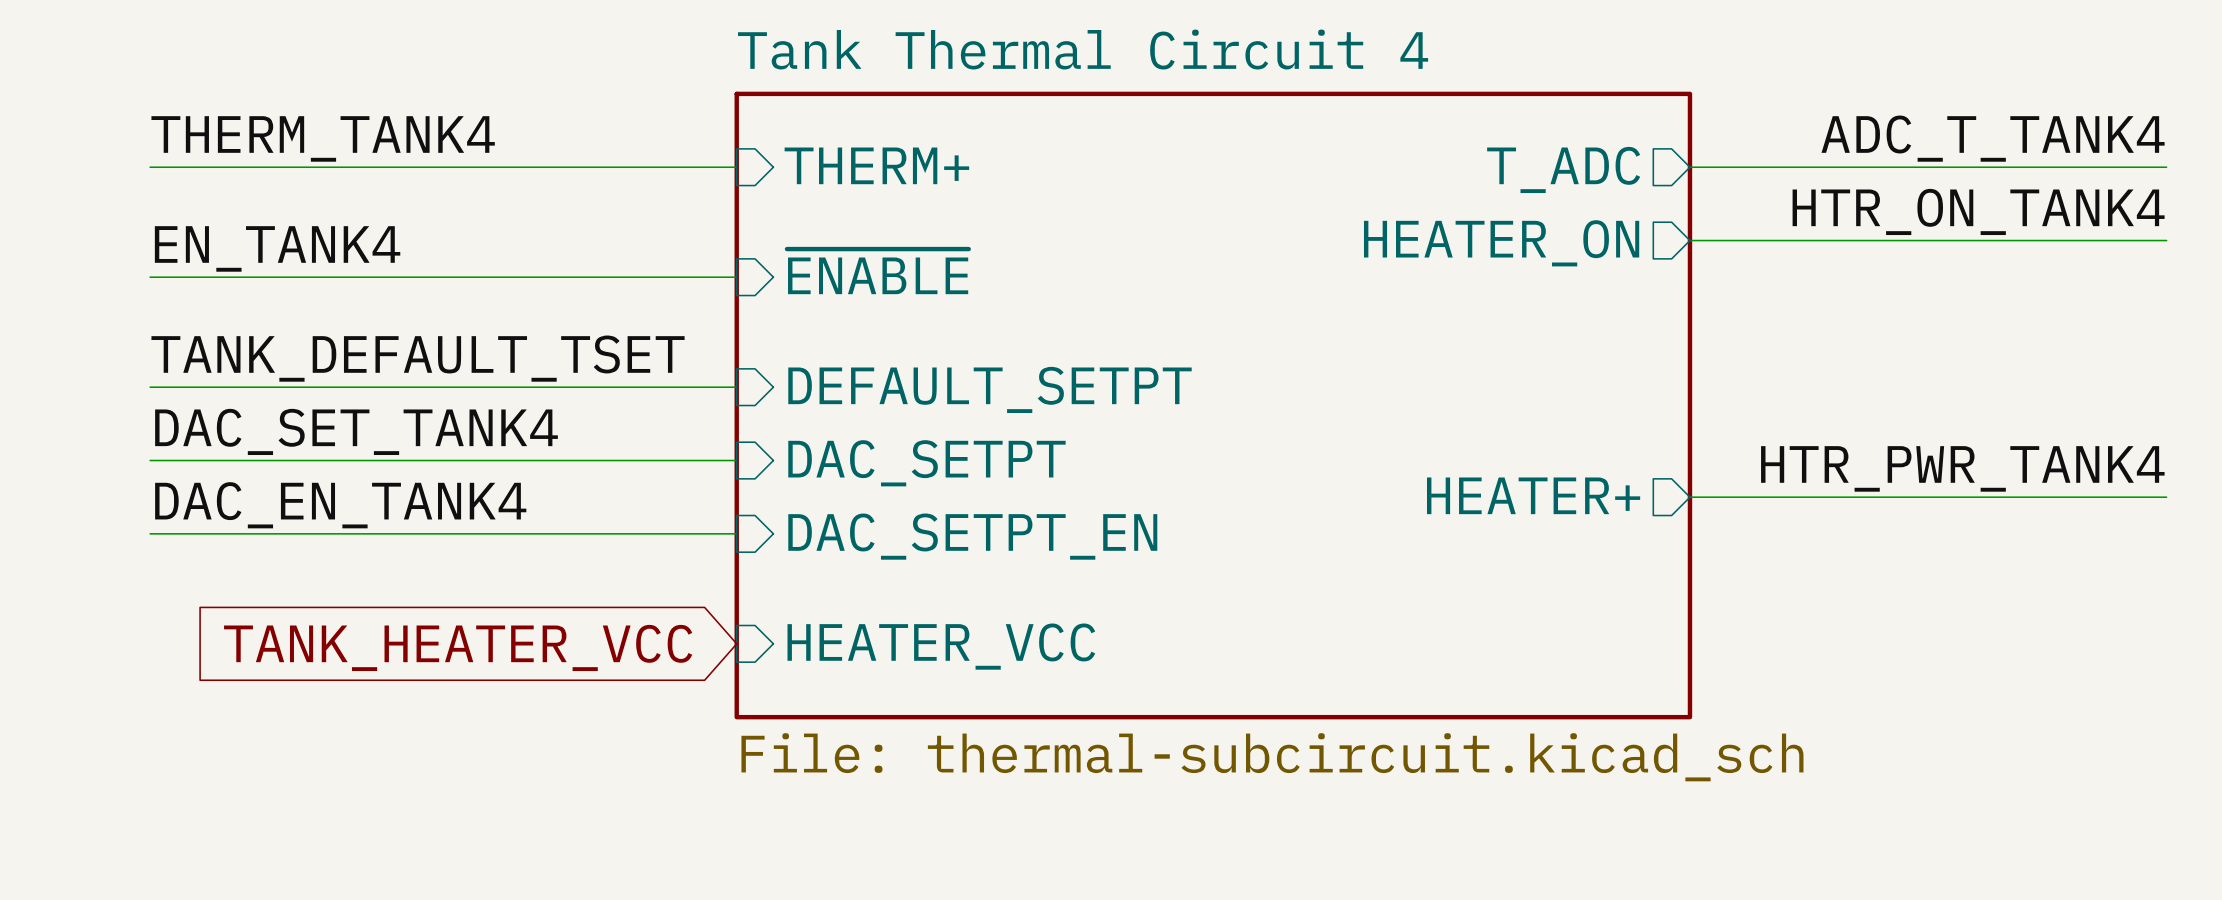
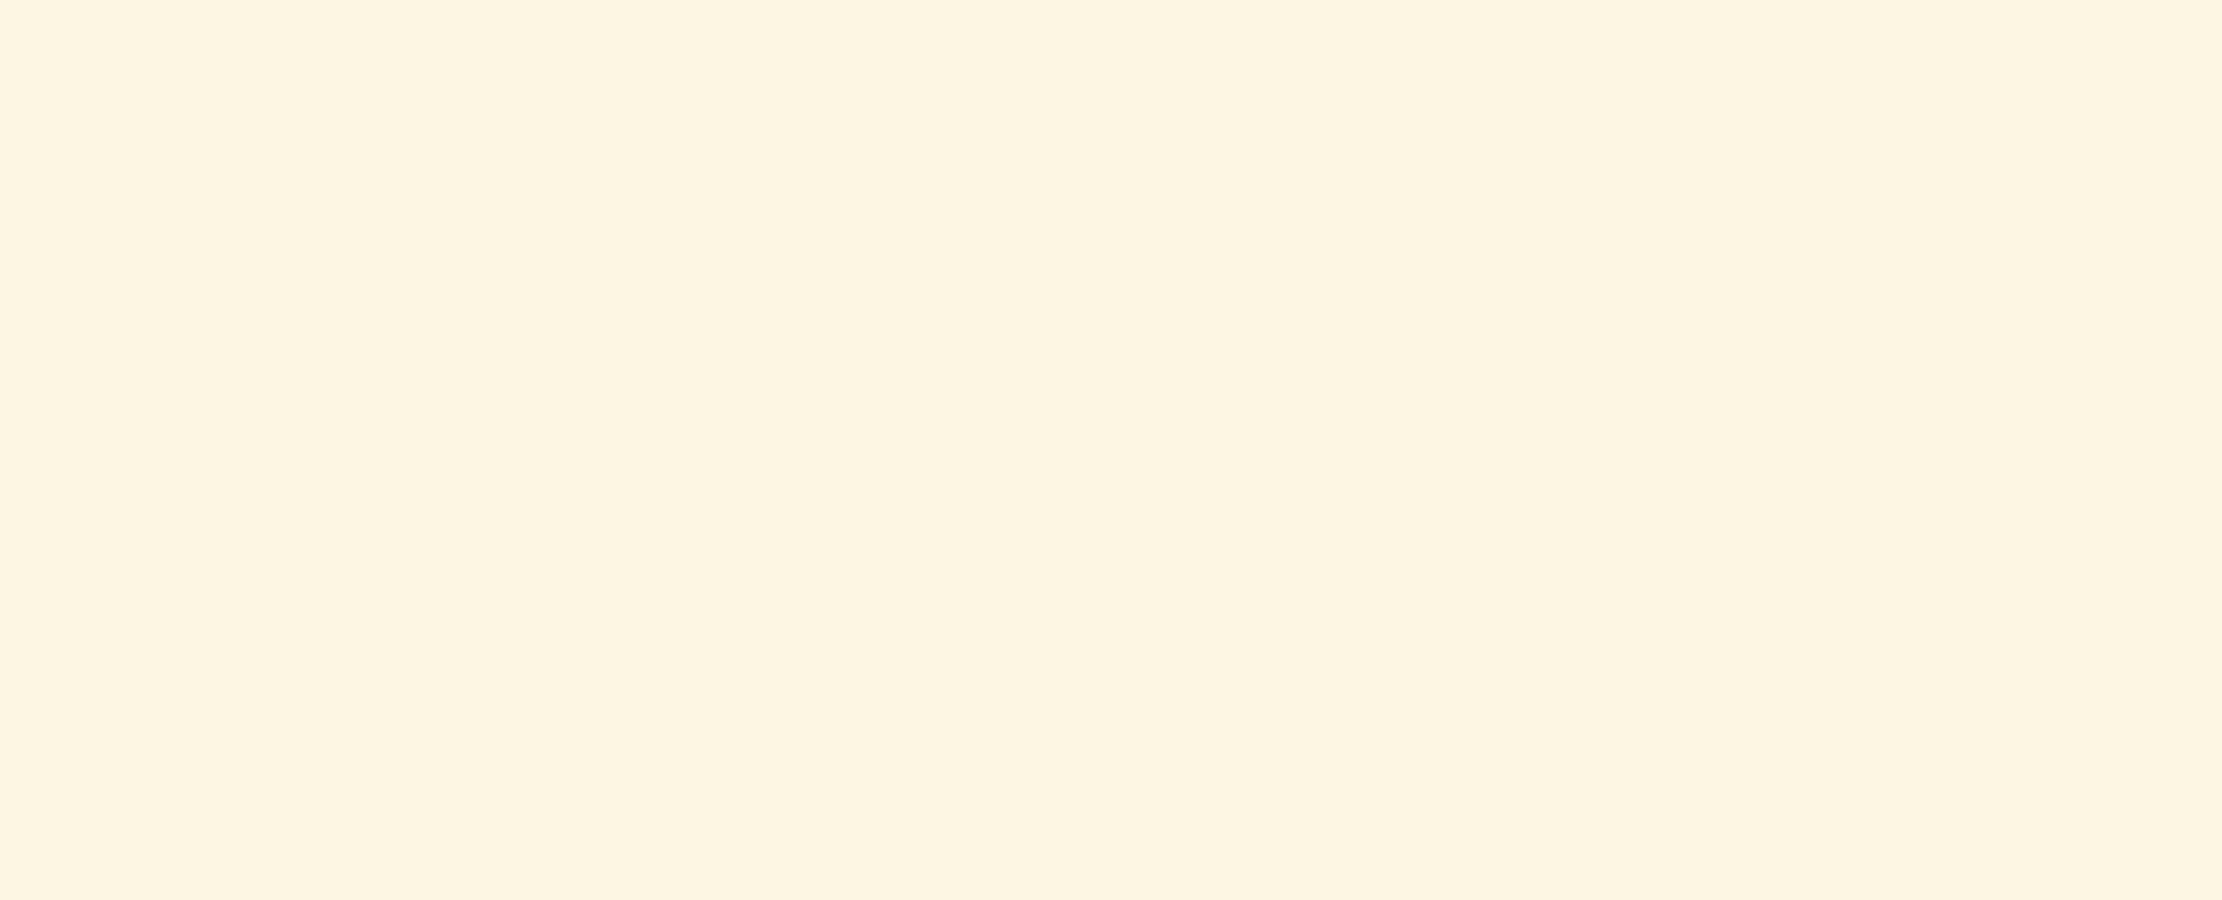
label: THERM_TANK4 (323, 138) -> none
label: ADC_T_TANK4 (1993, 138) -> none
sheet pin: THERM+ (876, 165) -> none
wire: (150, 167) (736, 167) -> none
wire: (1689, 167) (2166, 167) -> none
sheet pin: T_ADC (1563, 169) -> none
label: HTR_ON_TANK4 (1978, 211) -> none
wire: (1689, 240) (2166, 240) -> none
sheet pin: HEATER_ON (1501, 243) -> none
label: EN_TANK4 (277, 248) -> none
sheet pin: ~{ENABLE} (877, 271) -> none
wire: (150, 277) (736, 277) -> none
label: TANK_DEFAULT_TSET (418, 358) -> none
wire: (150, 387) (736, 387) -> none
sheet pin: DEFAULT_SETPT (989, 389) -> none
sheet Tank Thermal Circuit 4: File: thermal-subcircuit.kicad_sch (1213, 405) -> none
label: DAC_SET_TANK4 (356, 431) -> none
wire: (150, 460) (736, 460) -> none
sheet pin: DAC_SETPT (926, 463) -> none
label: HTR_PWR_TANK4 (1962, 468) -> none
sheet pin: HEATER+ (1533, 495) -> none
wire: (1689, 497) (2166, 497) -> none
label: DAC_EN_TANK4 (340, 505) -> none
wire: (150, 533) (736, 533) -> none
sheet pin: DAC_SETPT_EN (972, 536) -> none
sheet pin: HEATER_VCC (941, 646) -> none
global label: TANK_HEATER_VCC (458, 647) -> none

